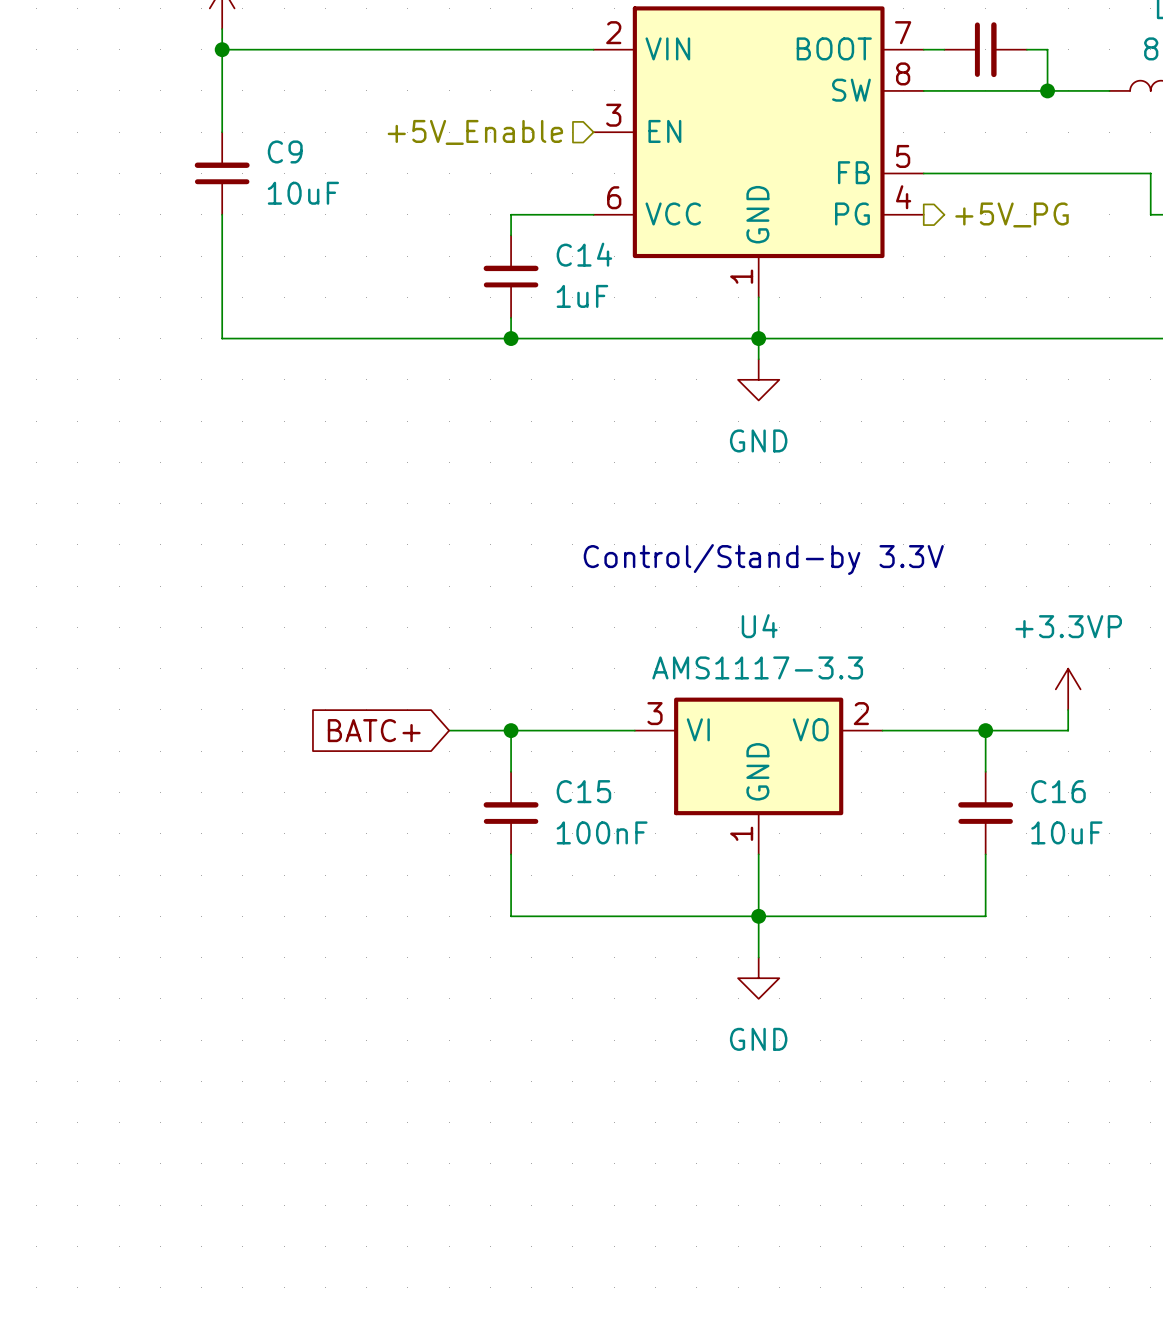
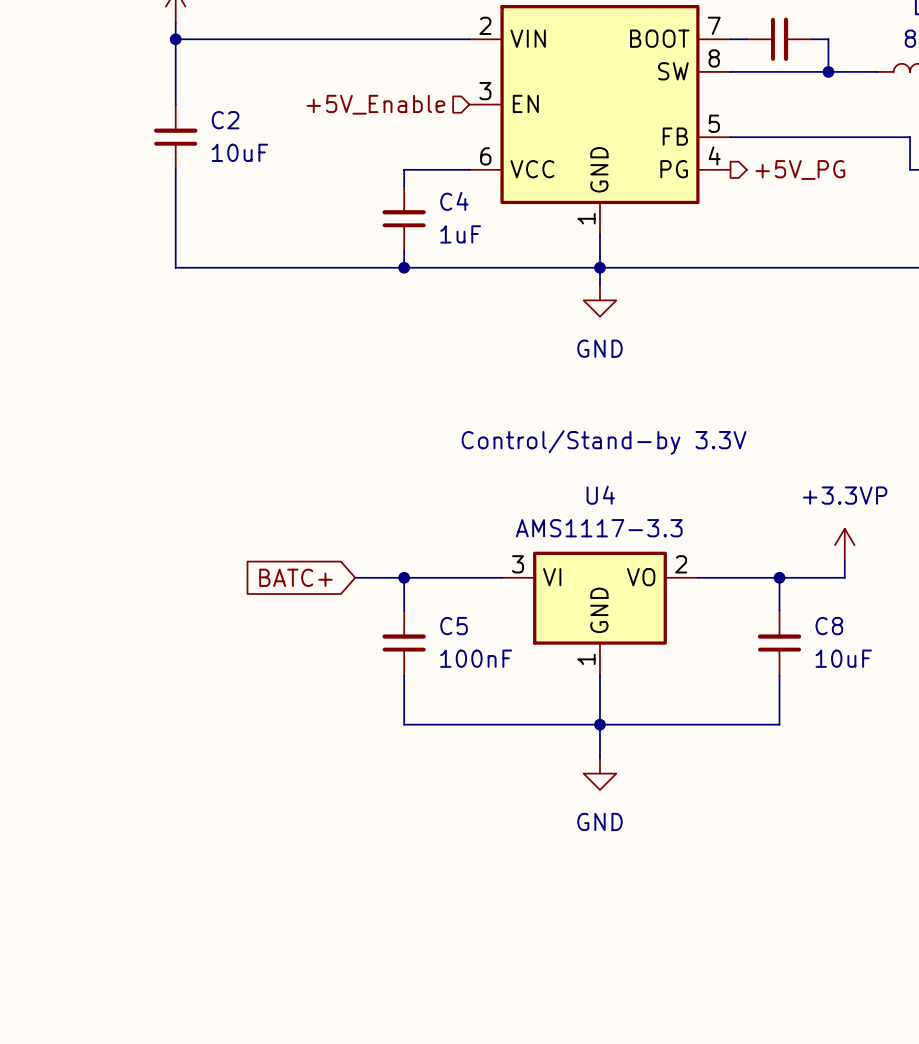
C9 name: C9 (285, 151) -> C2 (225, 120)
C14 name: C14 (584, 254) -> C4 (454, 201)
C15 name: C15 (583, 791) -> C5 (454, 626)
C16 name: C16 (1058, 791) -> C8 (829, 626)

